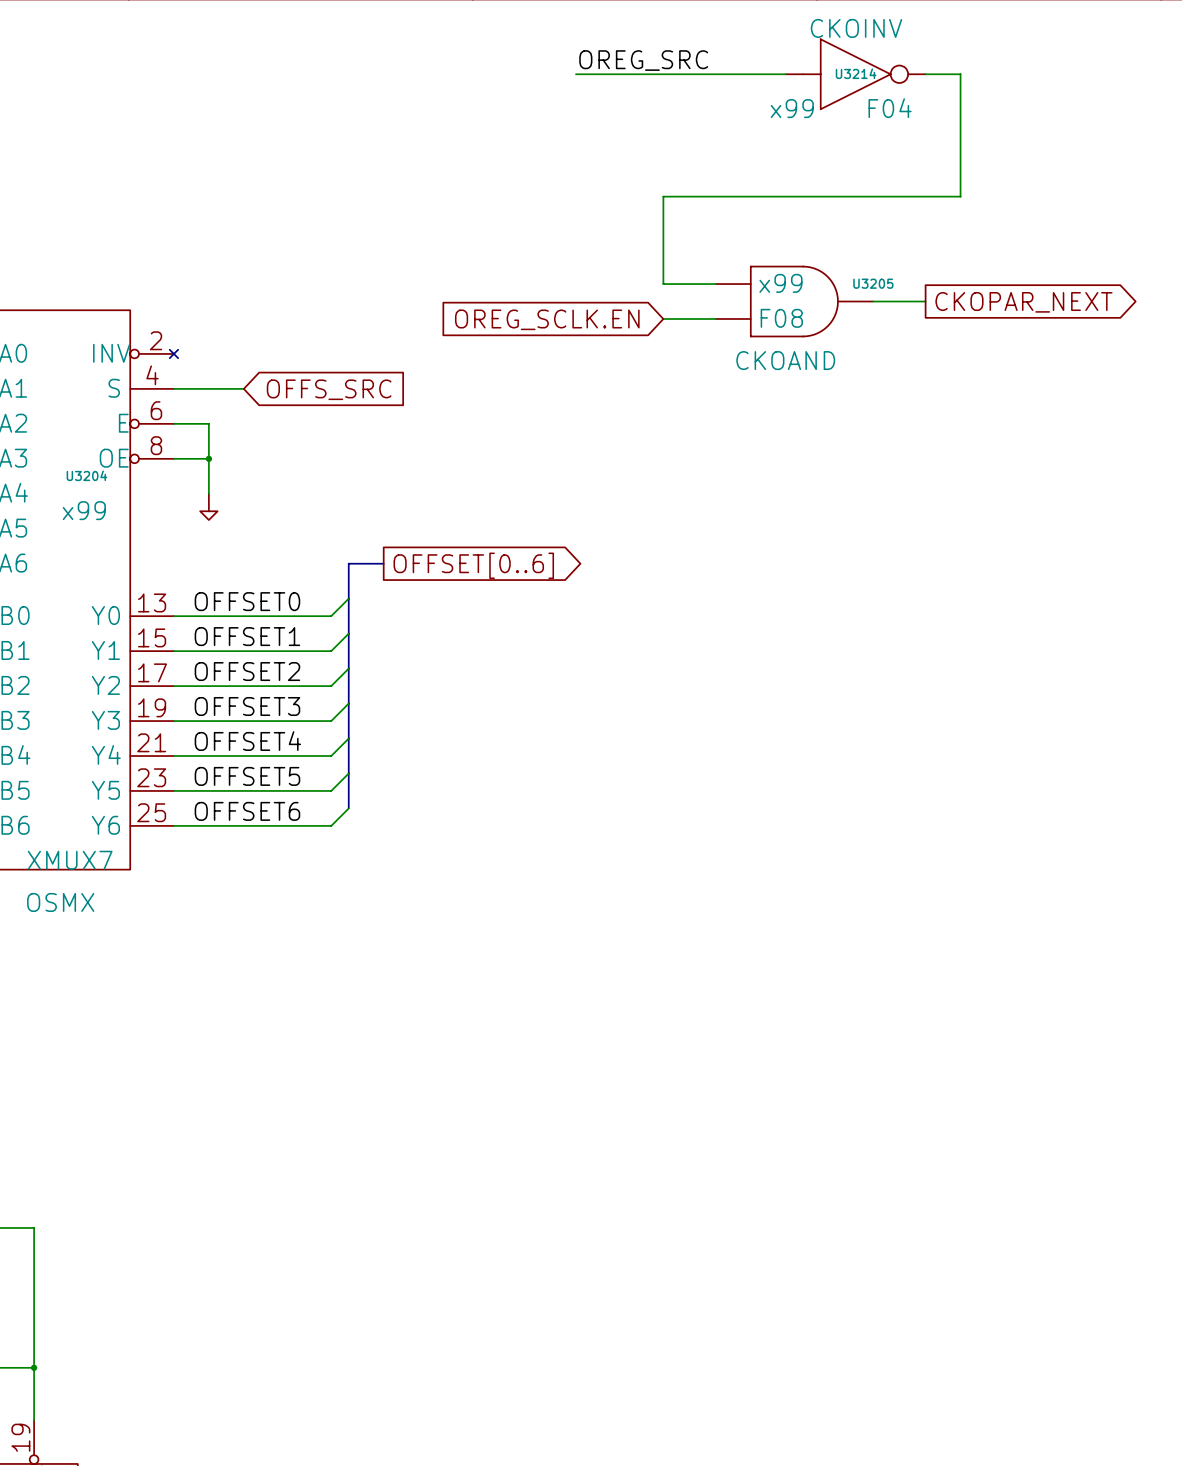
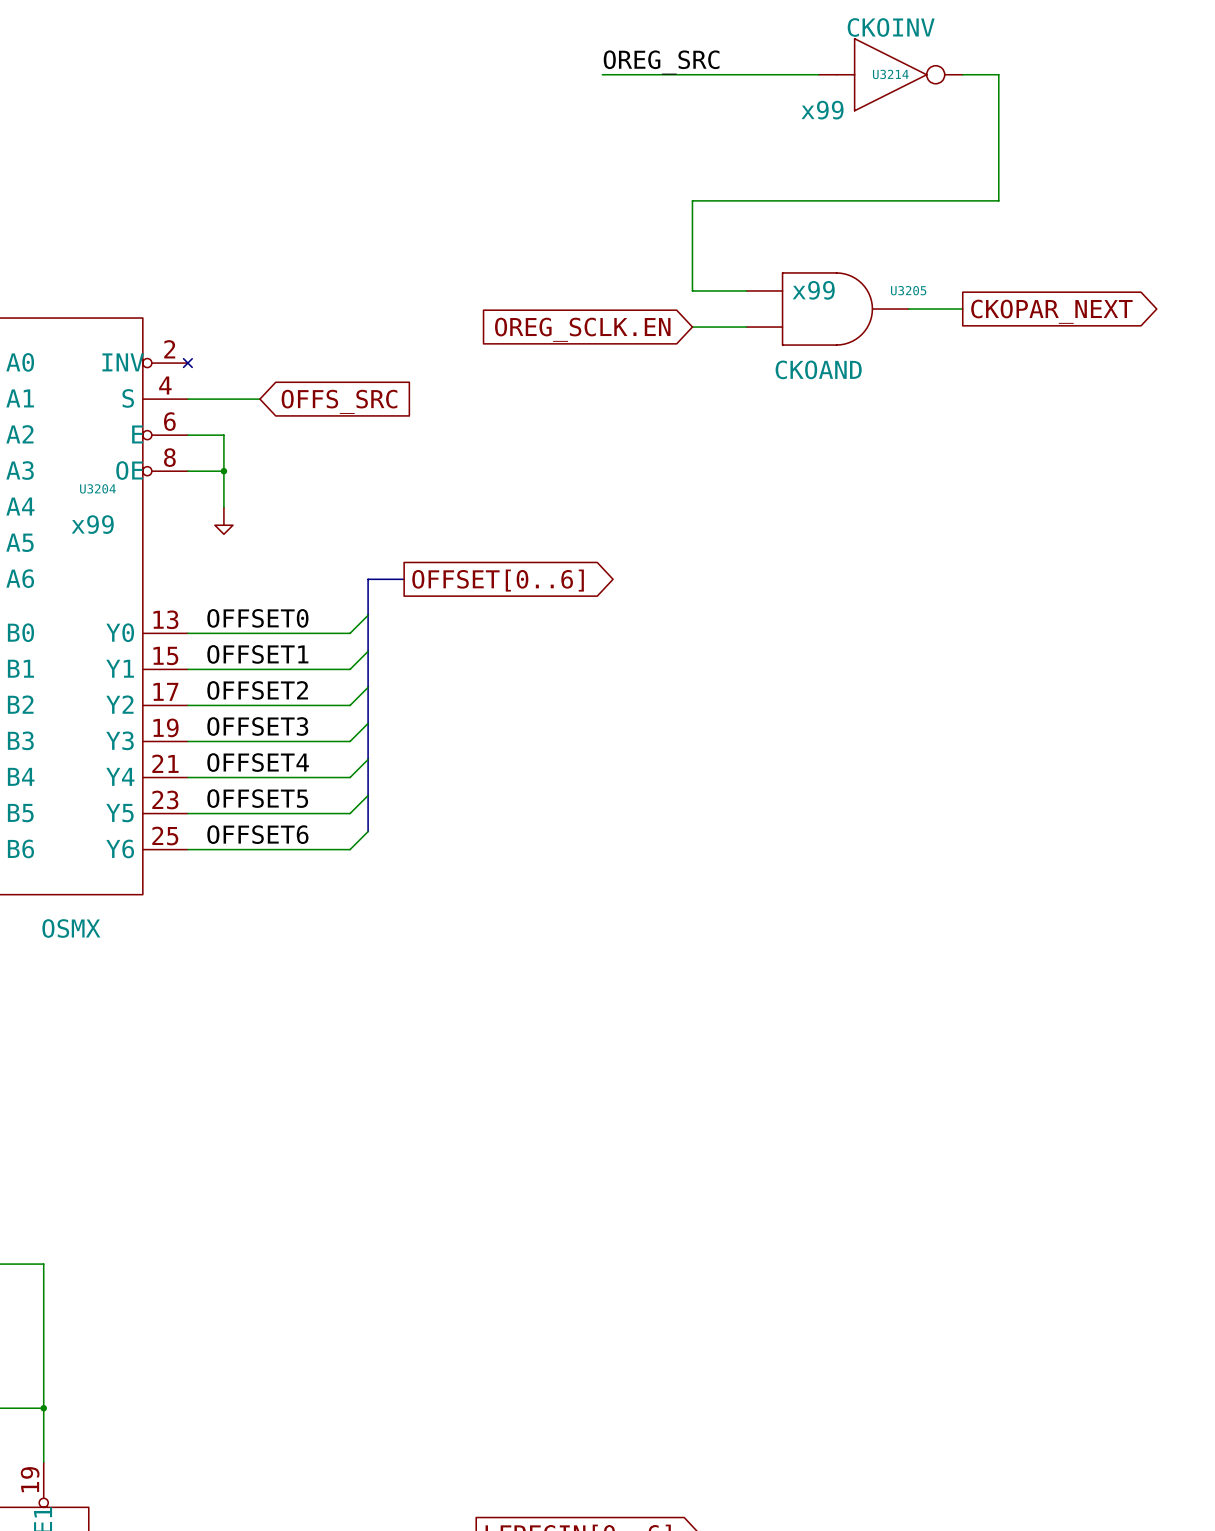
U3214 value: F04 (890, 108) -> none
U3205 value: F08 (781, 318) -> none
U3204 value: XMUX7 (70, 860) -> none

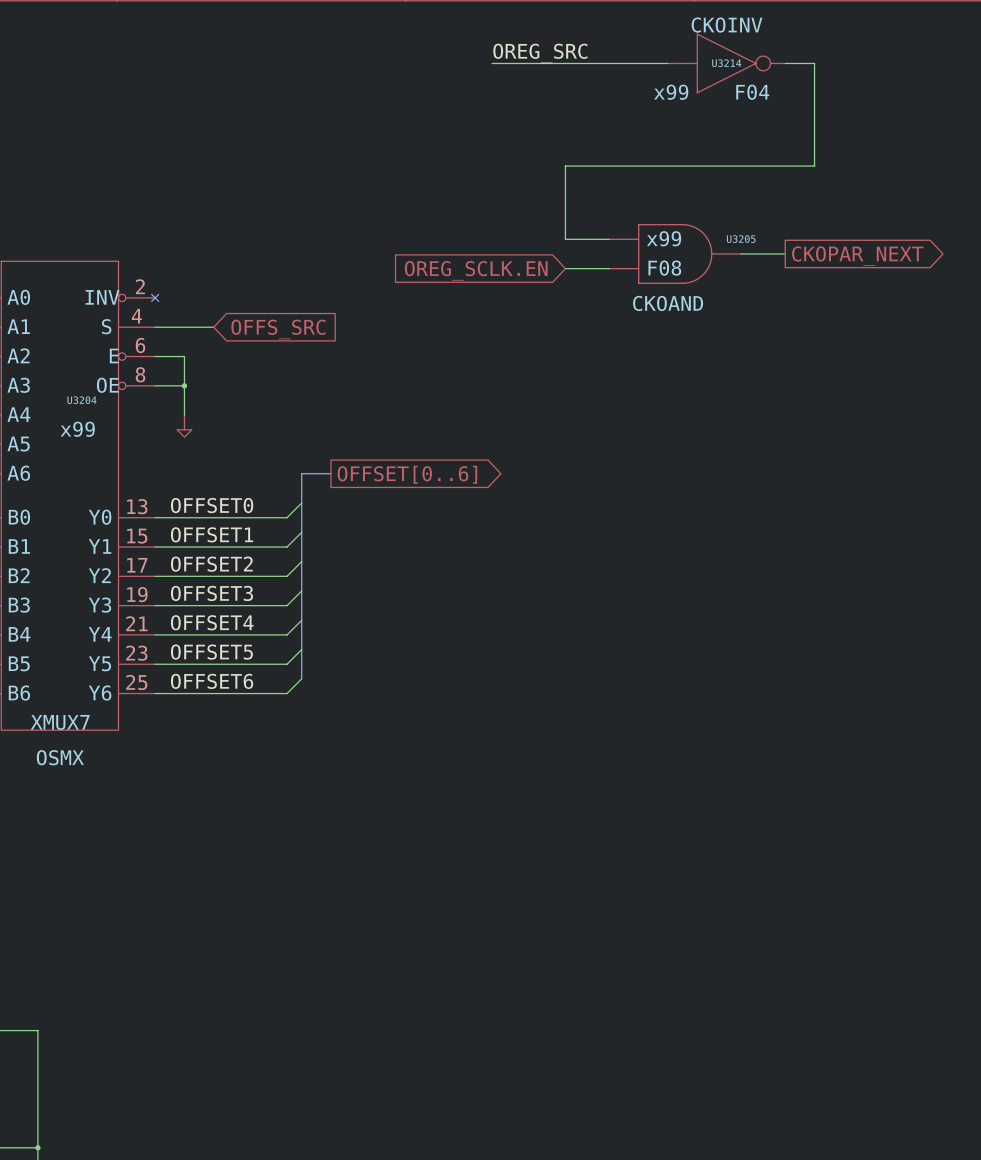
U3214 value: none -> F04 (752, 92)
U3205 value: none -> F08 (664, 268)
U3204 value: none -> XMUX7 (60, 722)

